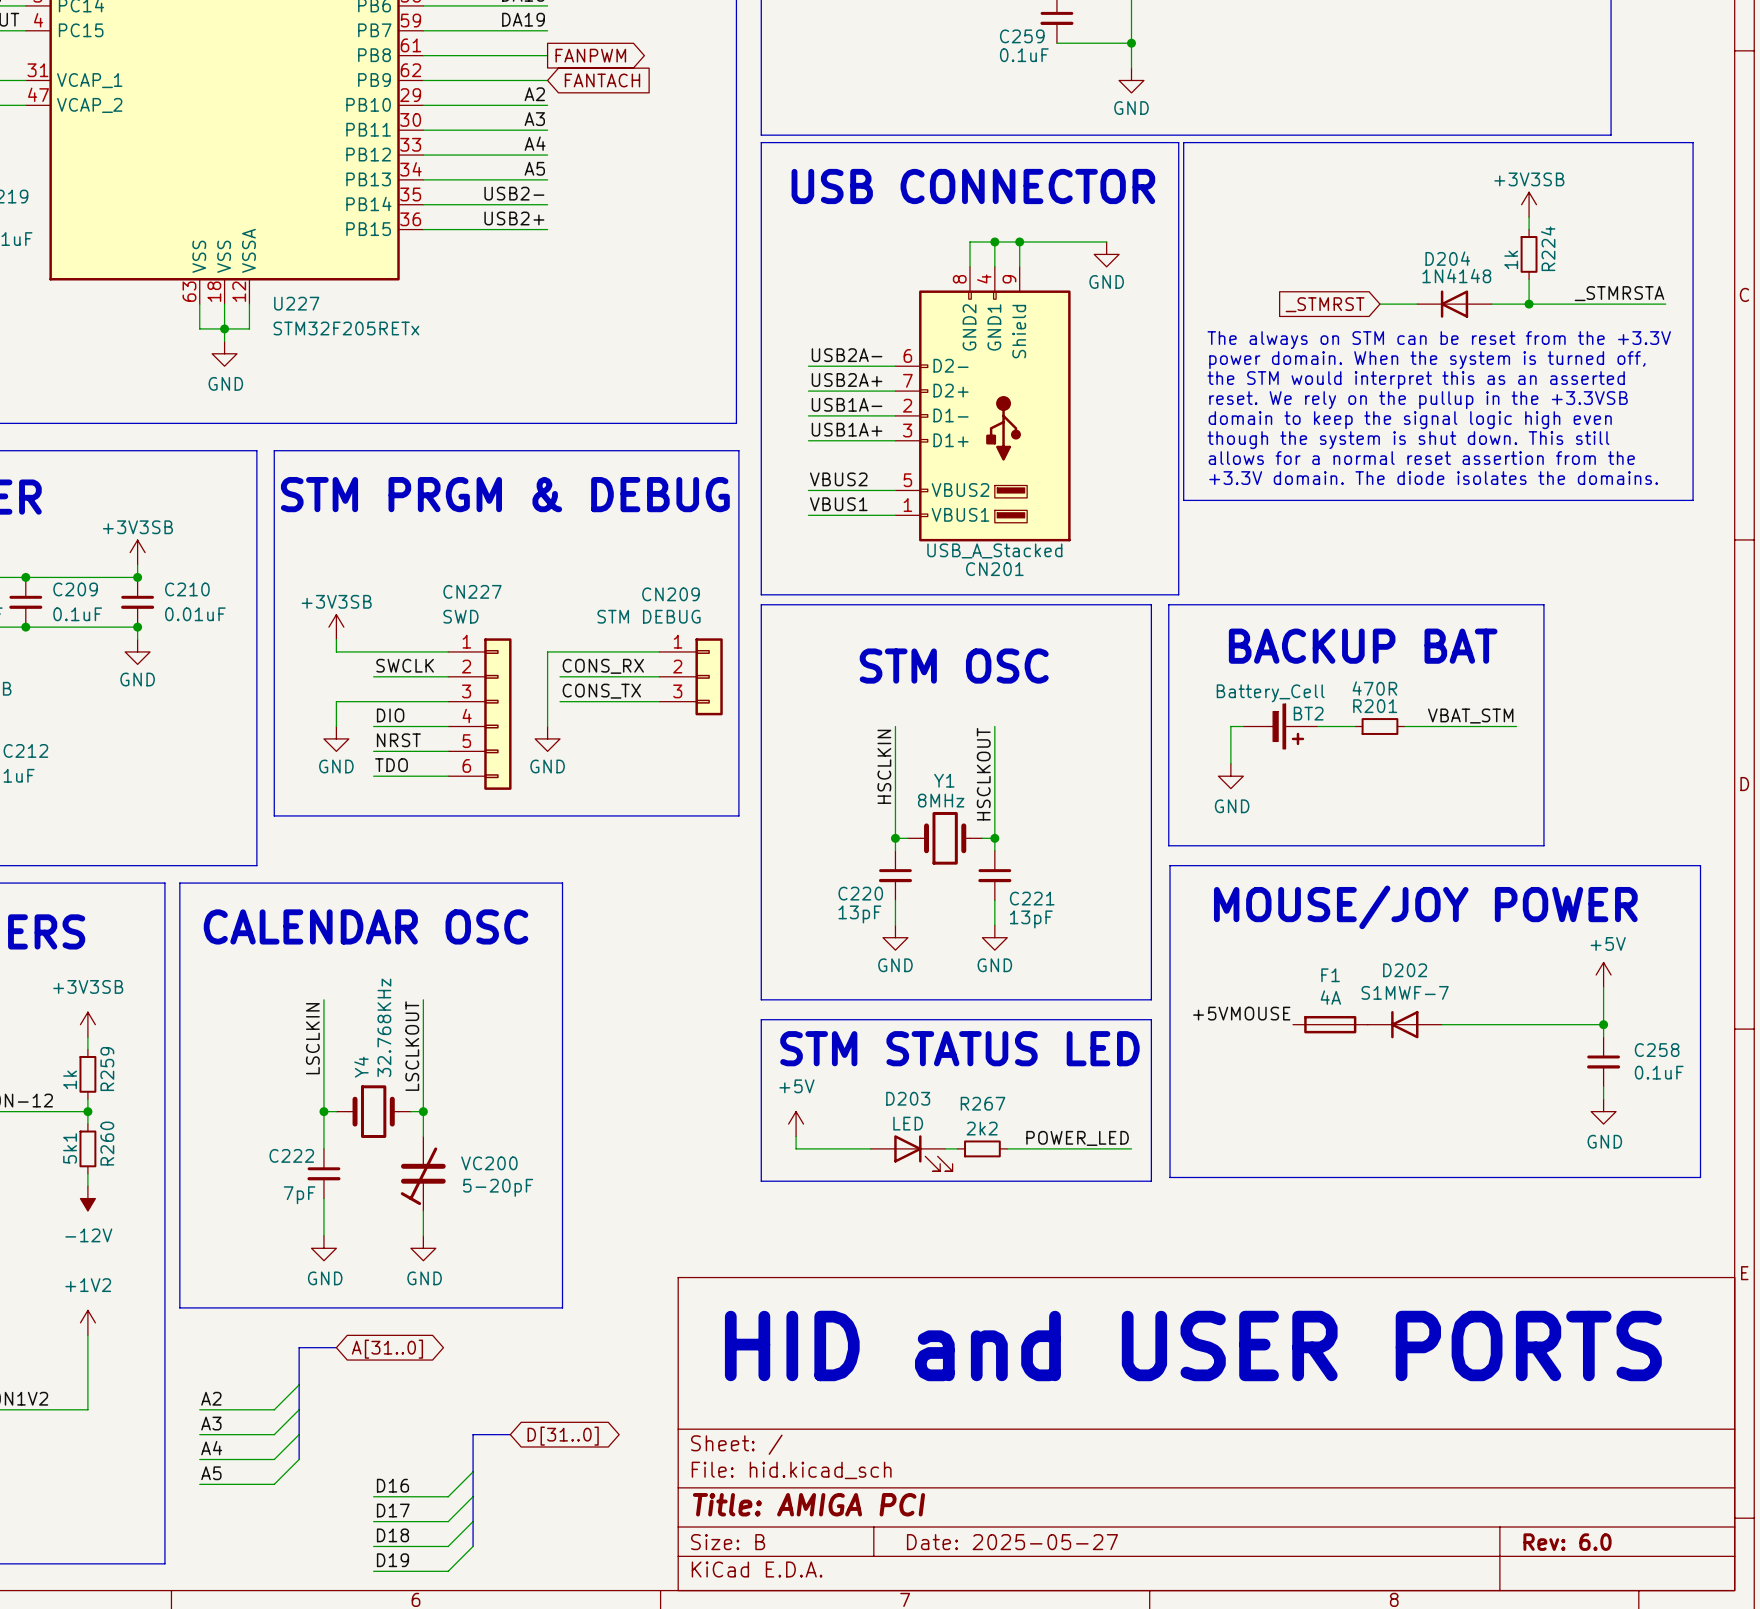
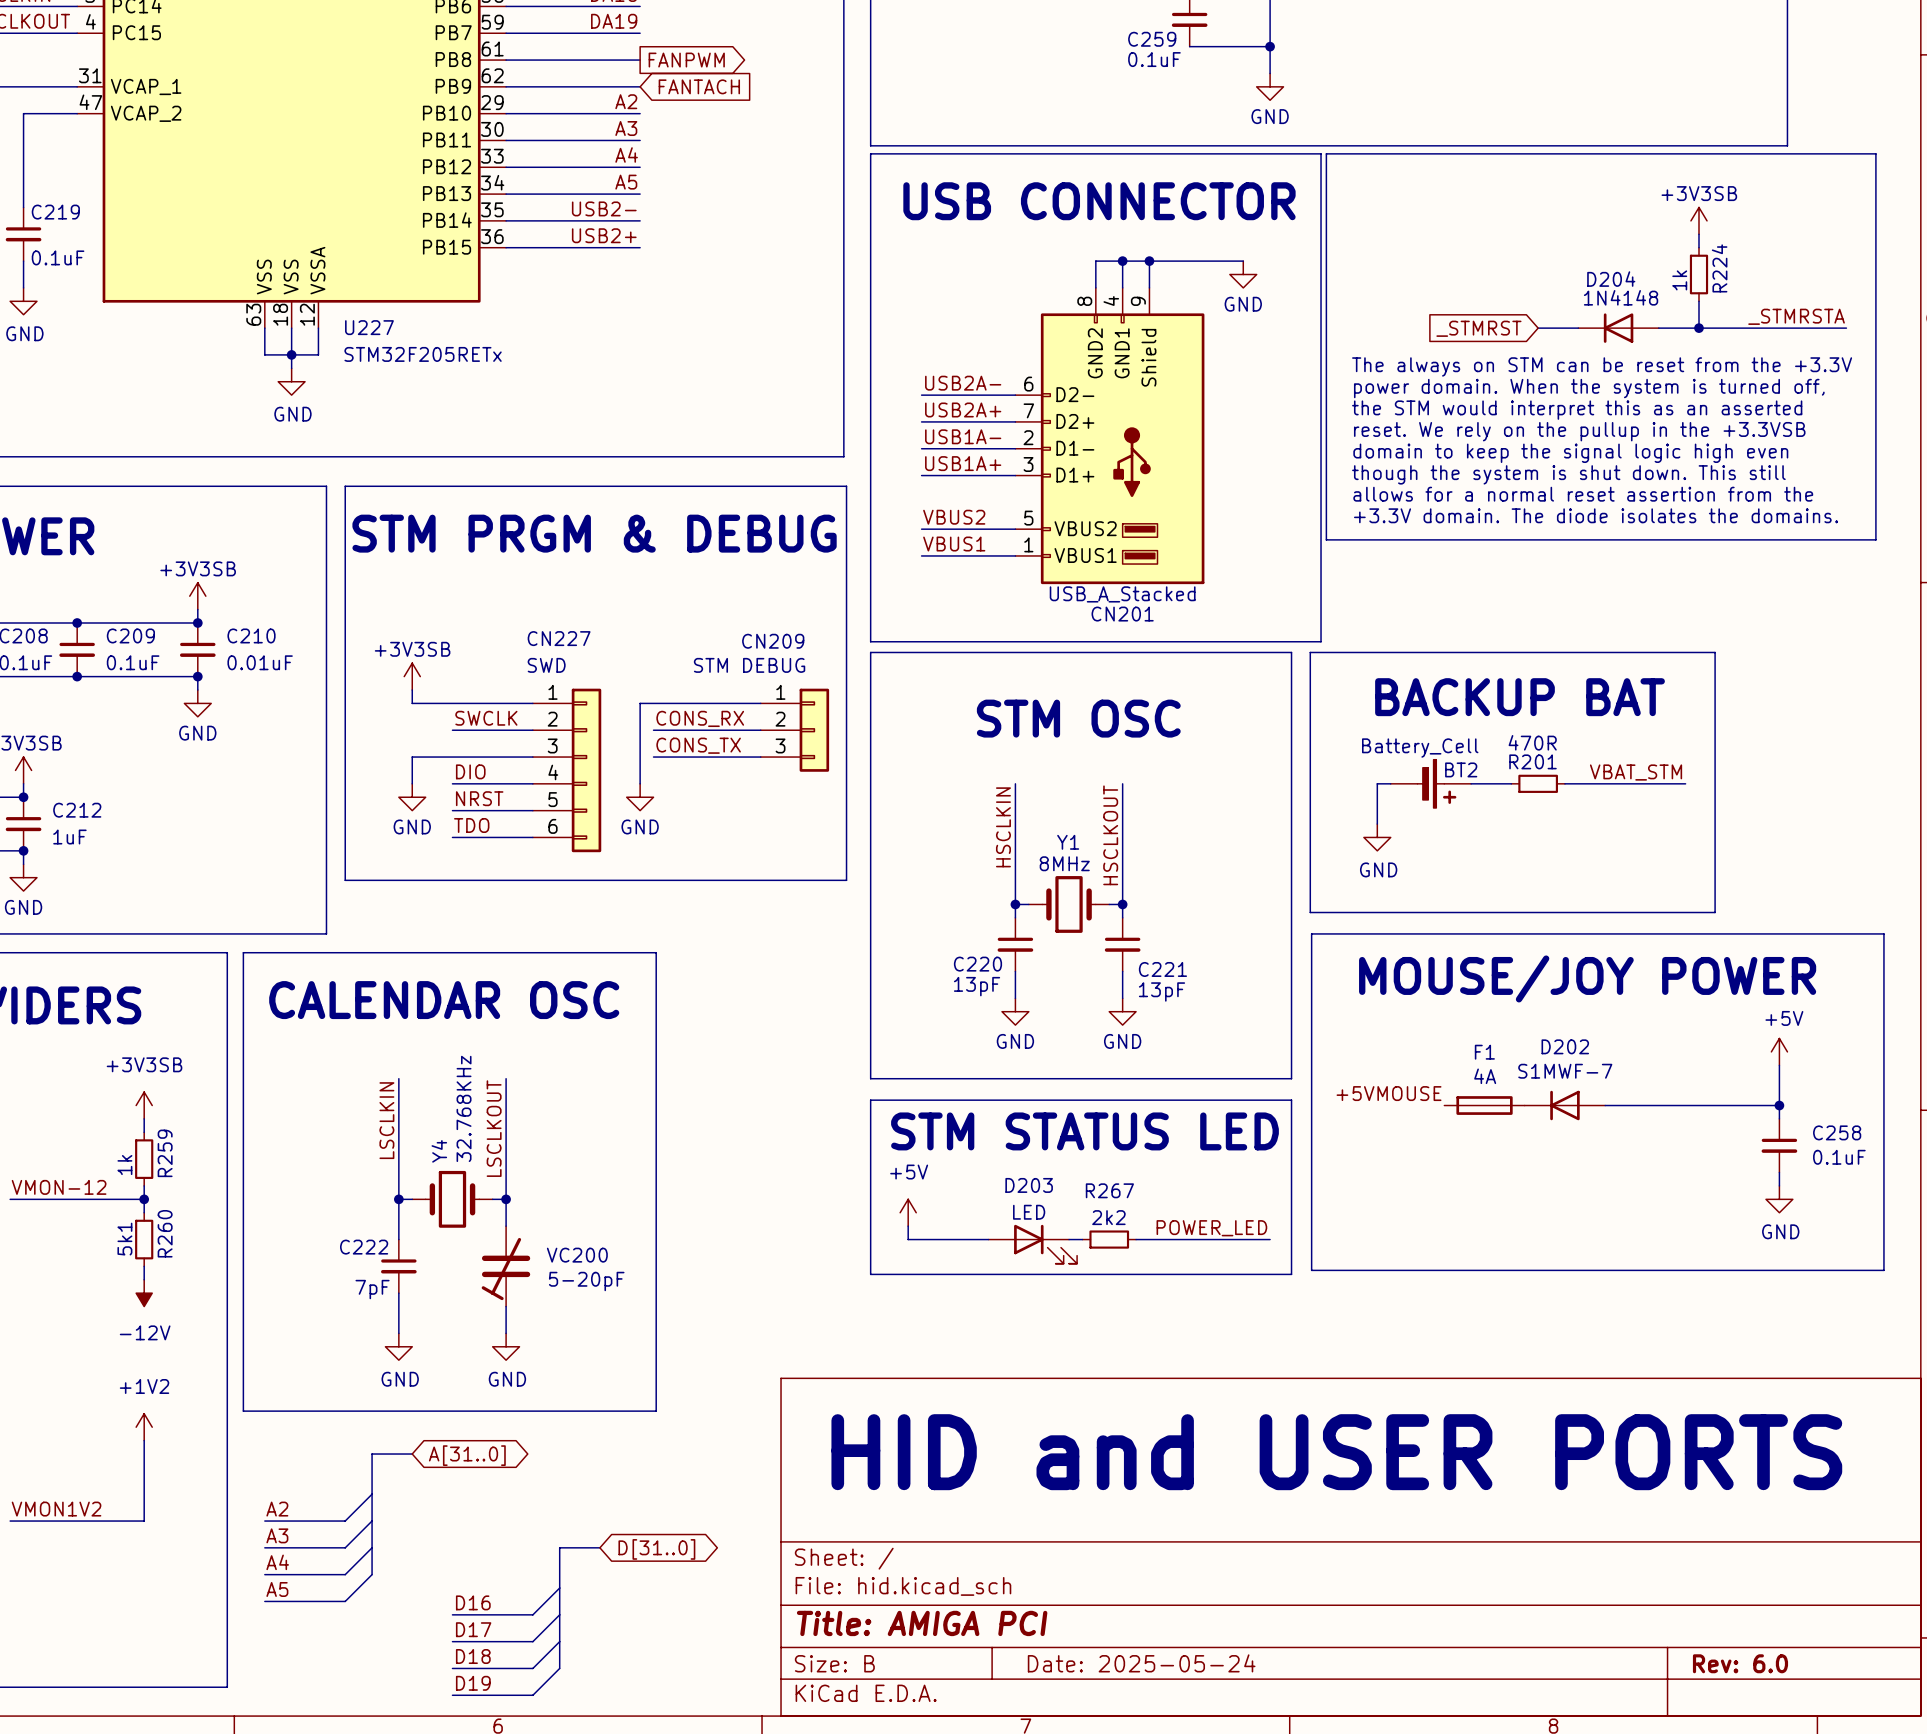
title block: Date: 2025-05-27 (1012, 1542) -> Date: 2025-05-24 (1141, 1663)

